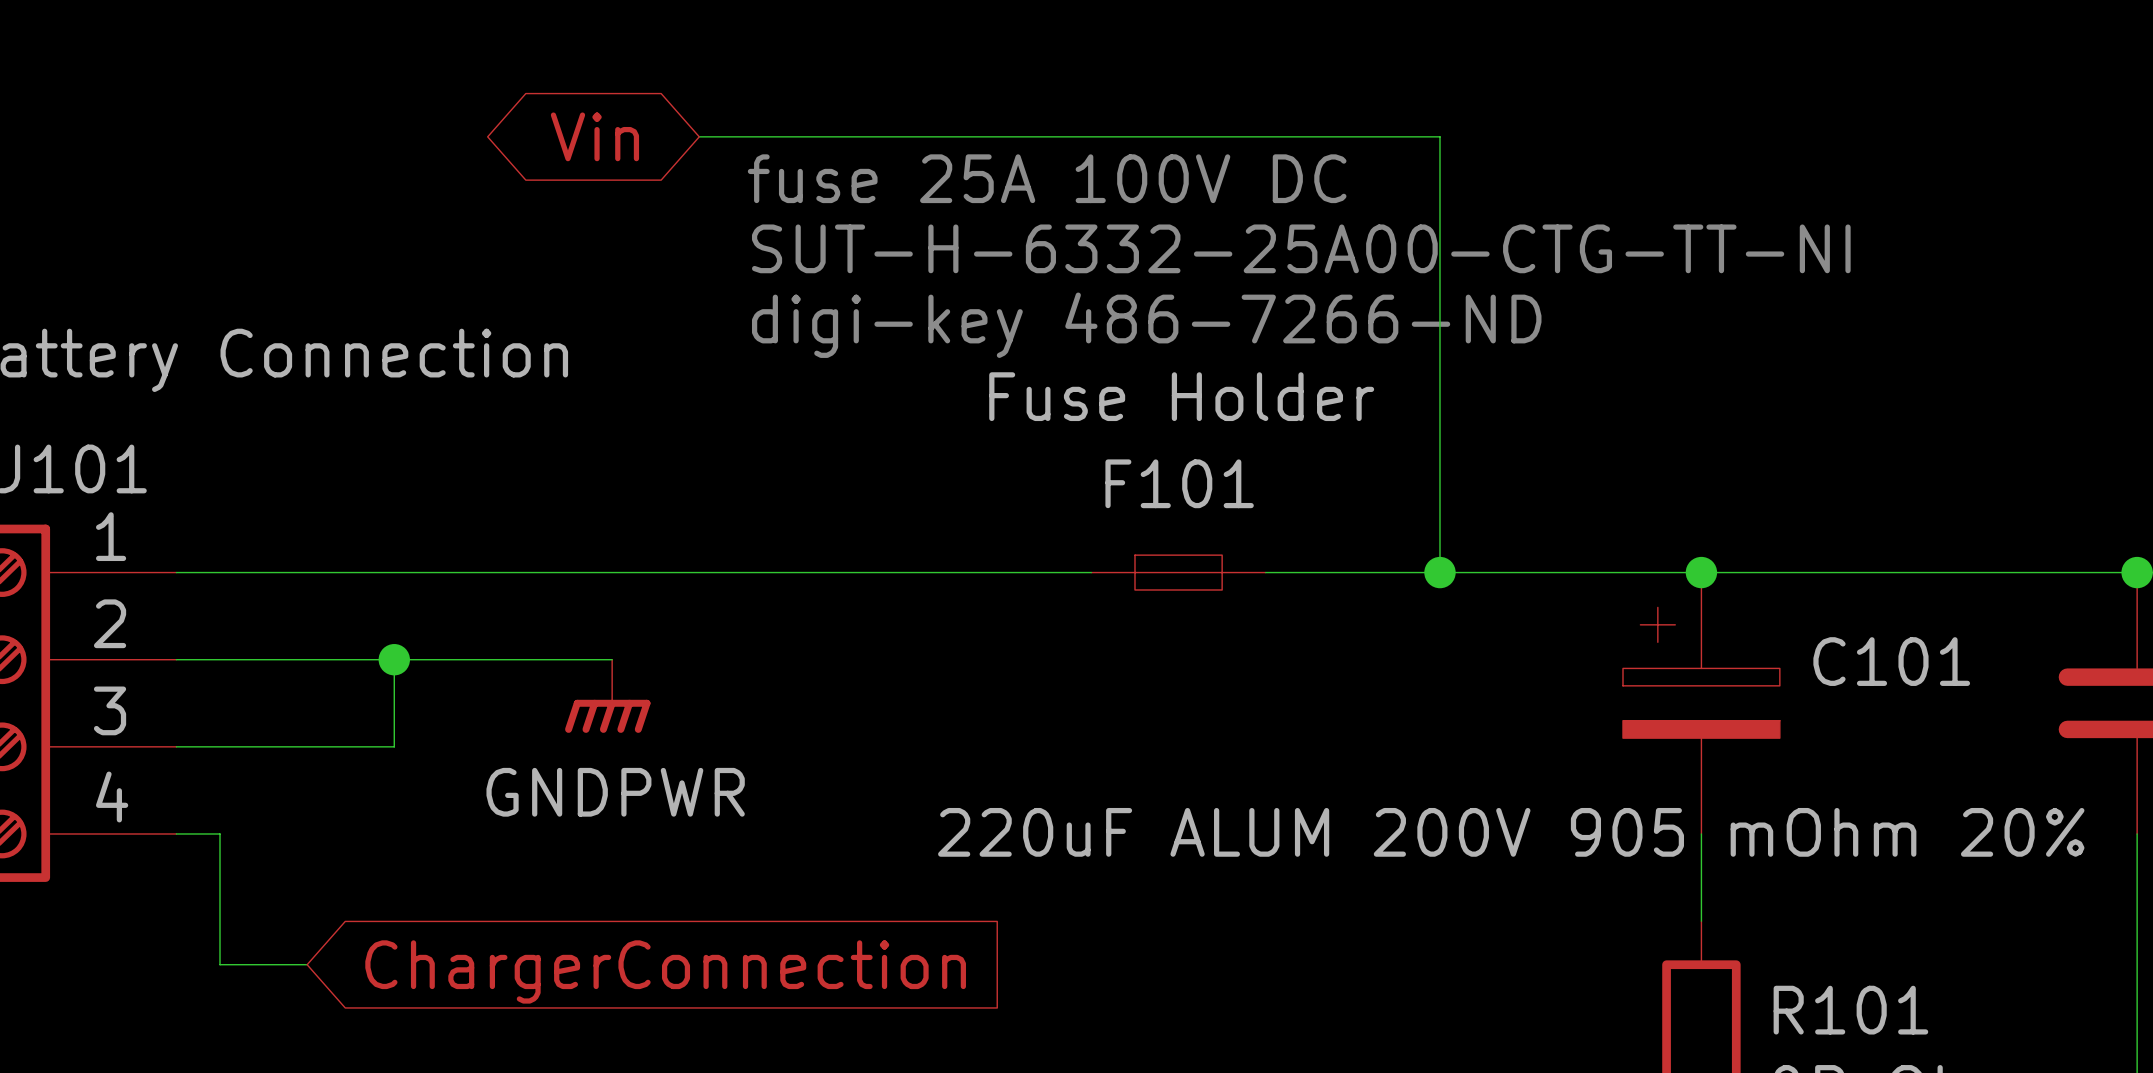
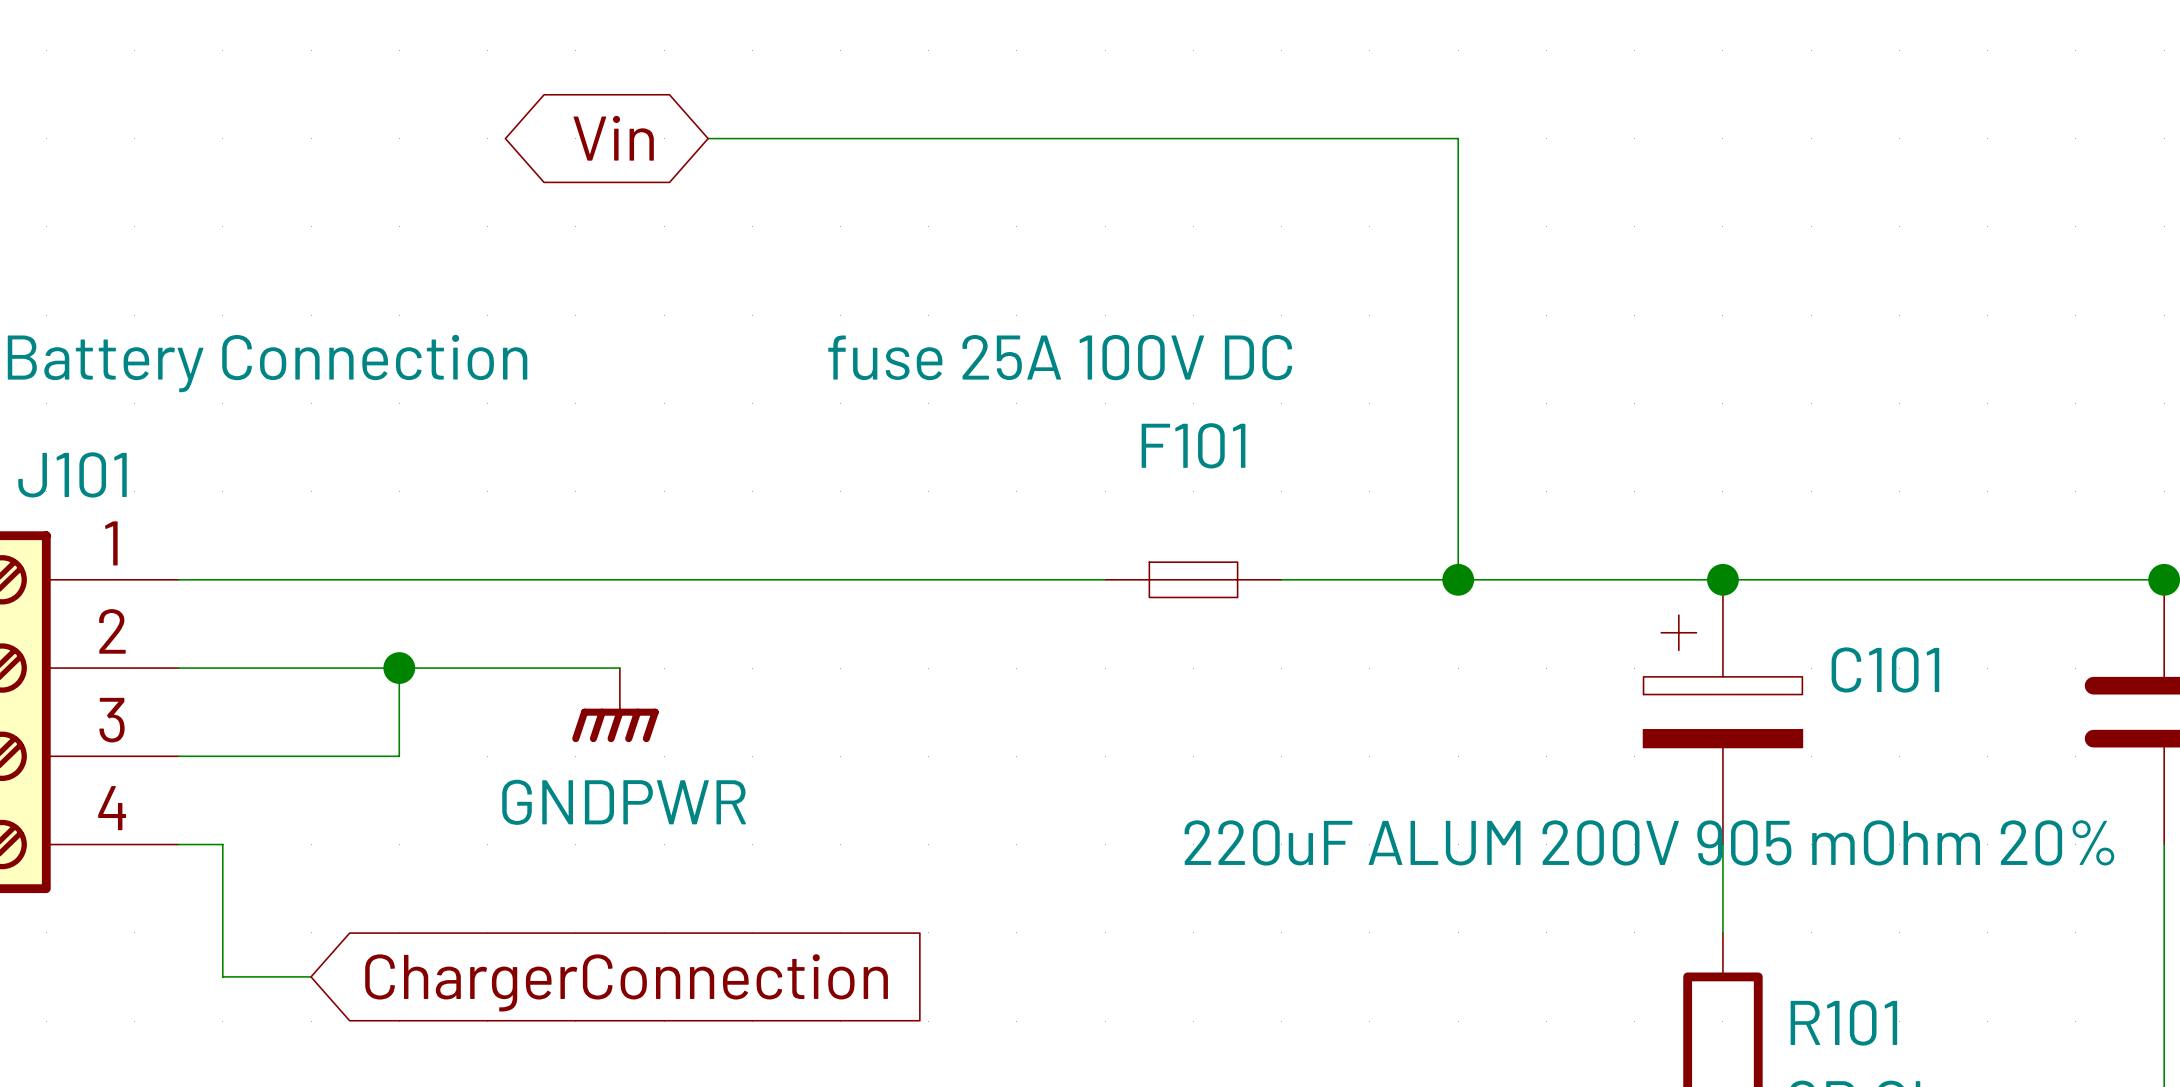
text: fuse 25A 100V DC (1047, 178) -> none
text: SUT-H-6332-25A00-CTG-TT-NI (1301, 248) -> none
text: digi-key 486-7266-ND (1146, 325) -> none
F101 value: Fuse Holder (1181, 396) -> fuse 25A 100V DC (1060, 357)
F101 name position: F101 (1179, 483) -> F101 (1193, 445)

